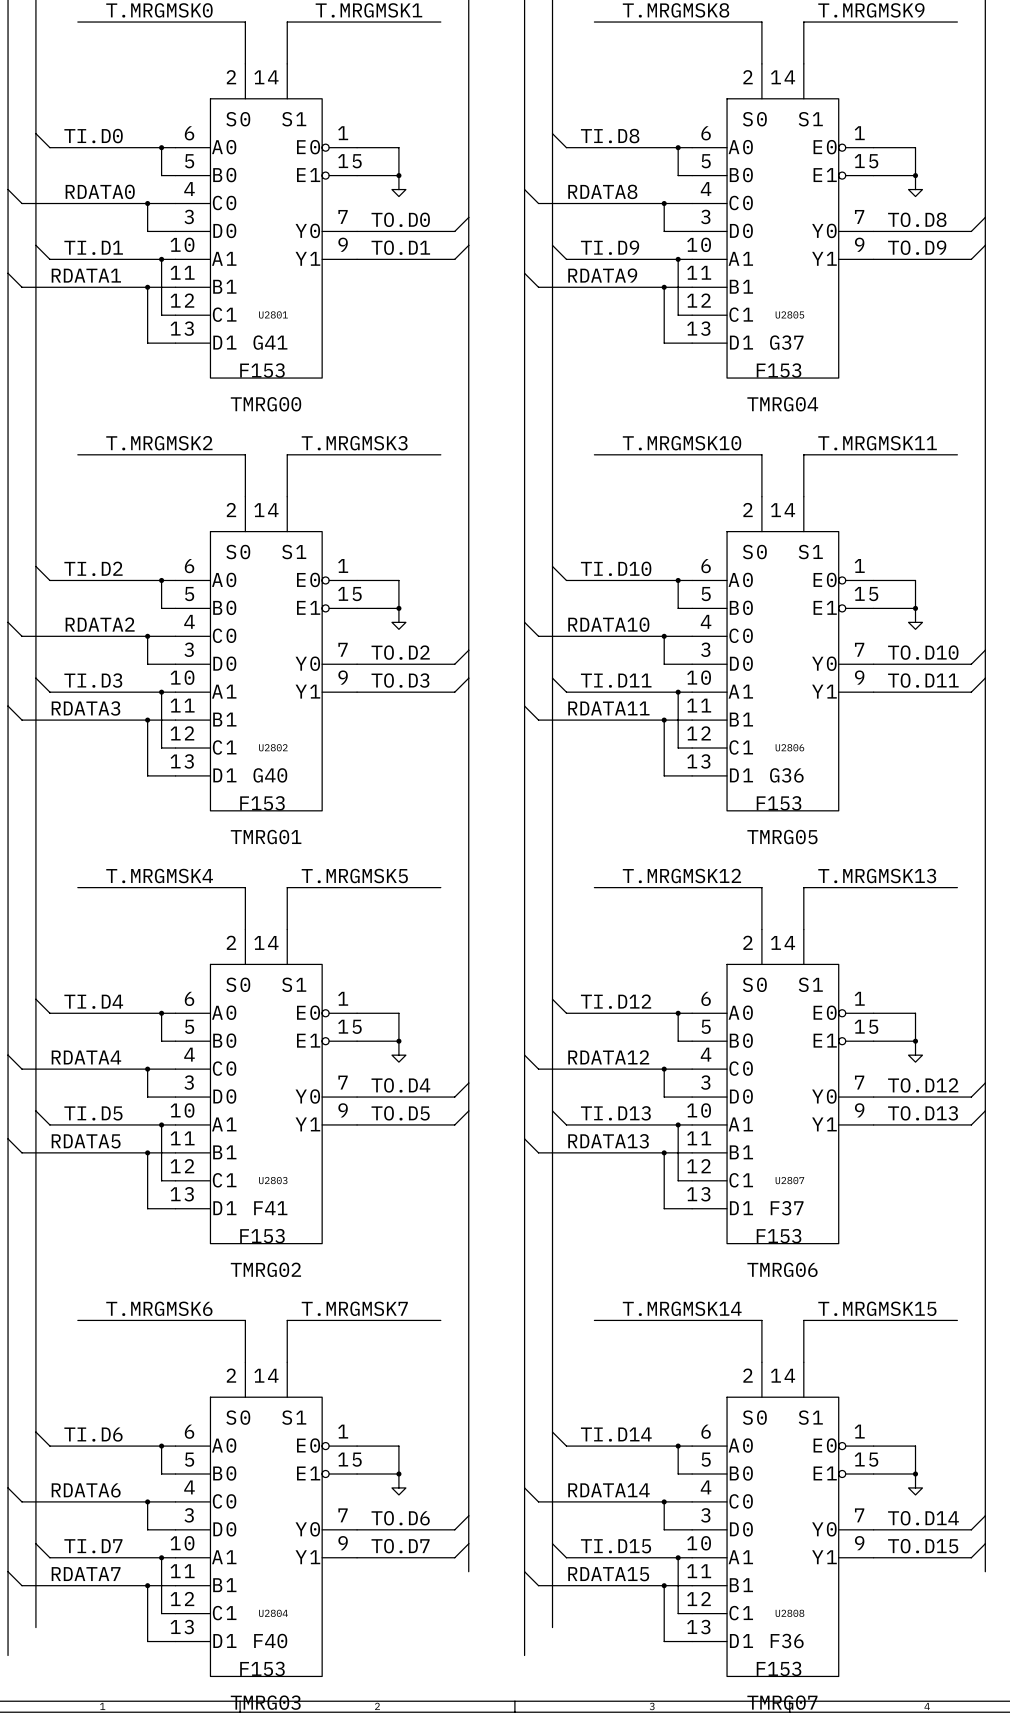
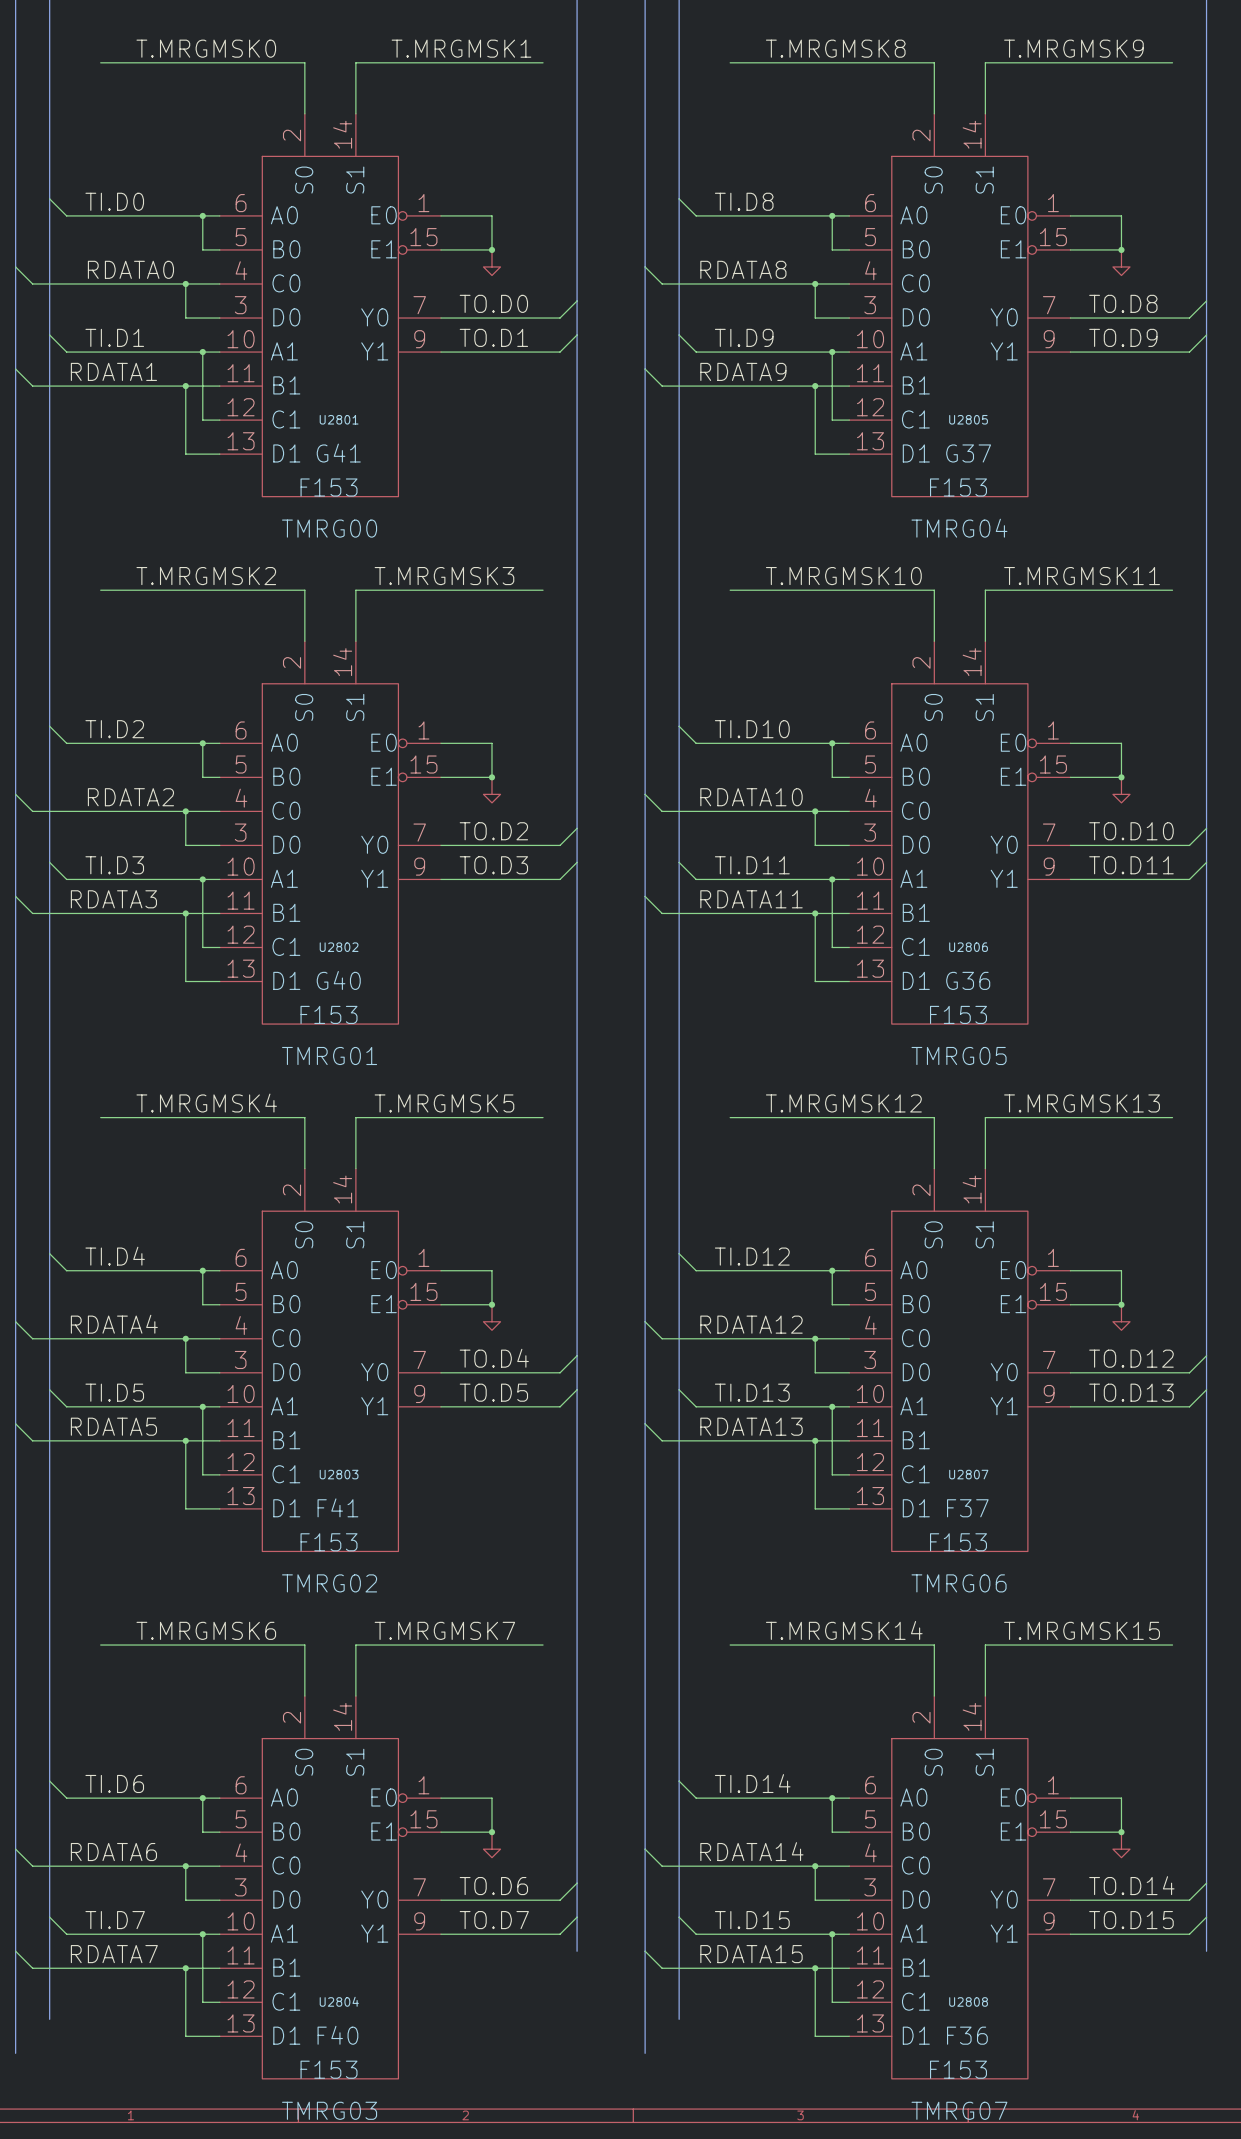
U2801 symbol: [175, 63, 358, 379] -> [219, 113, 441, 497]
U2805 symbol: [692, 63, 874, 379] -> [849, 113, 1071, 497]
U2802 symbol: [175, 496, 358, 811] -> [219, 641, 441, 1025]
U2806 symbol: [692, 496, 874, 811] -> [849, 641, 1071, 1025]
U2803 symbol: [175, 929, 358, 1244] -> [219, 1168, 441, 1552]
U2807 symbol: [692, 929, 874, 1244] -> [849, 1168, 1071, 1552]
U2804 symbol: [175, 1362, 358, 1677] -> [219, 1696, 441, 2079]
U2808 symbol: [692, 1362, 874, 1677] -> [849, 1696, 1071, 2079]

